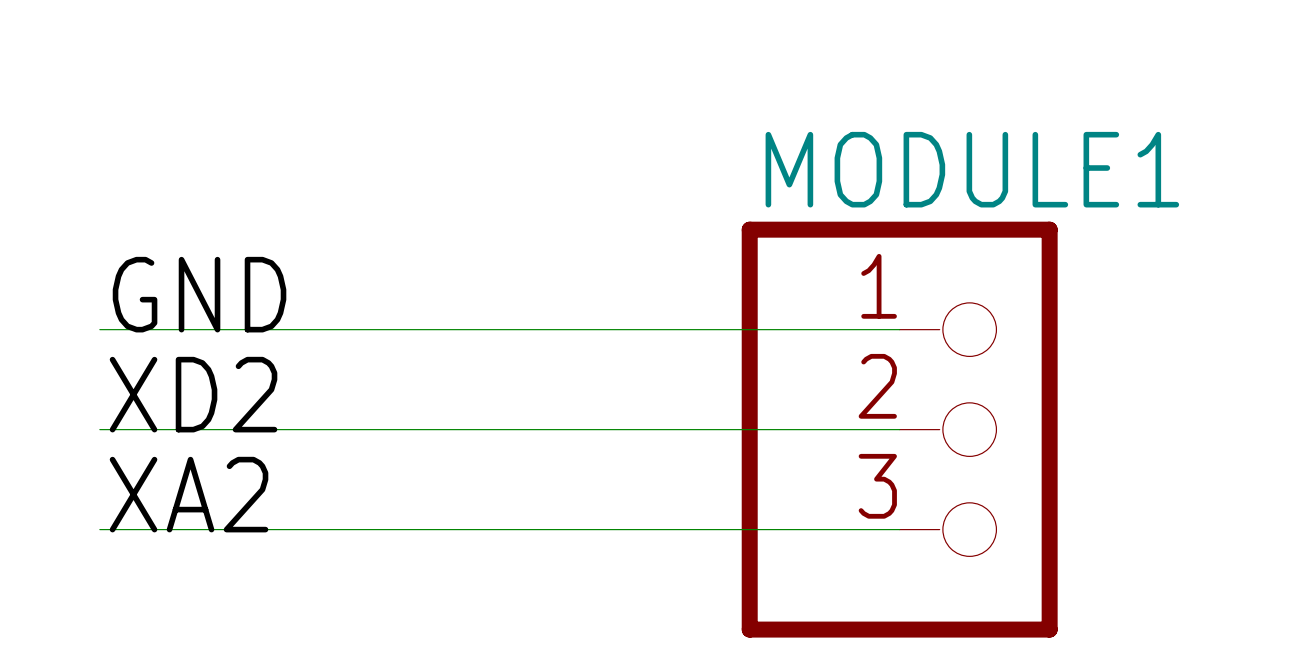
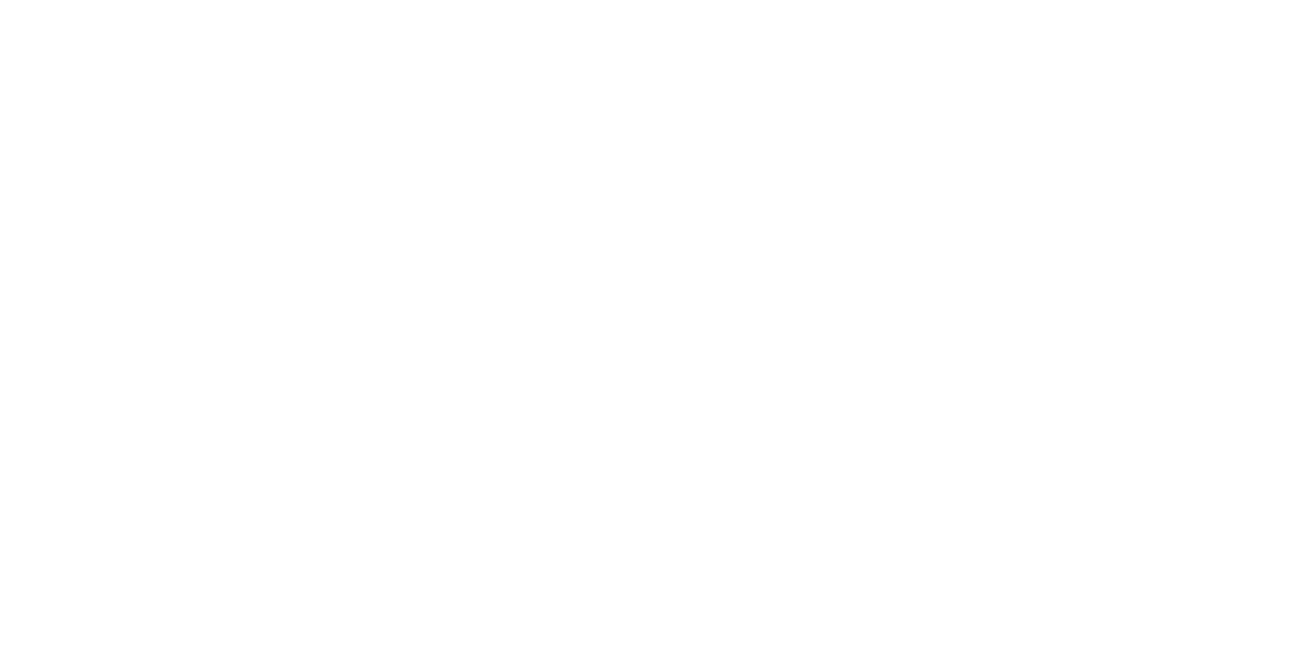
label: GND (199, 294) -> none
wire: (99, 329) (899, 329) -> none
label: XD2 (193, 394) -> none
wire: (99, 429) (899, 429) -> none
MODULE1: (899, 429) -> none
label: XA2 (189, 494) -> none
wire: (99, 529) (899, 529) -> none

